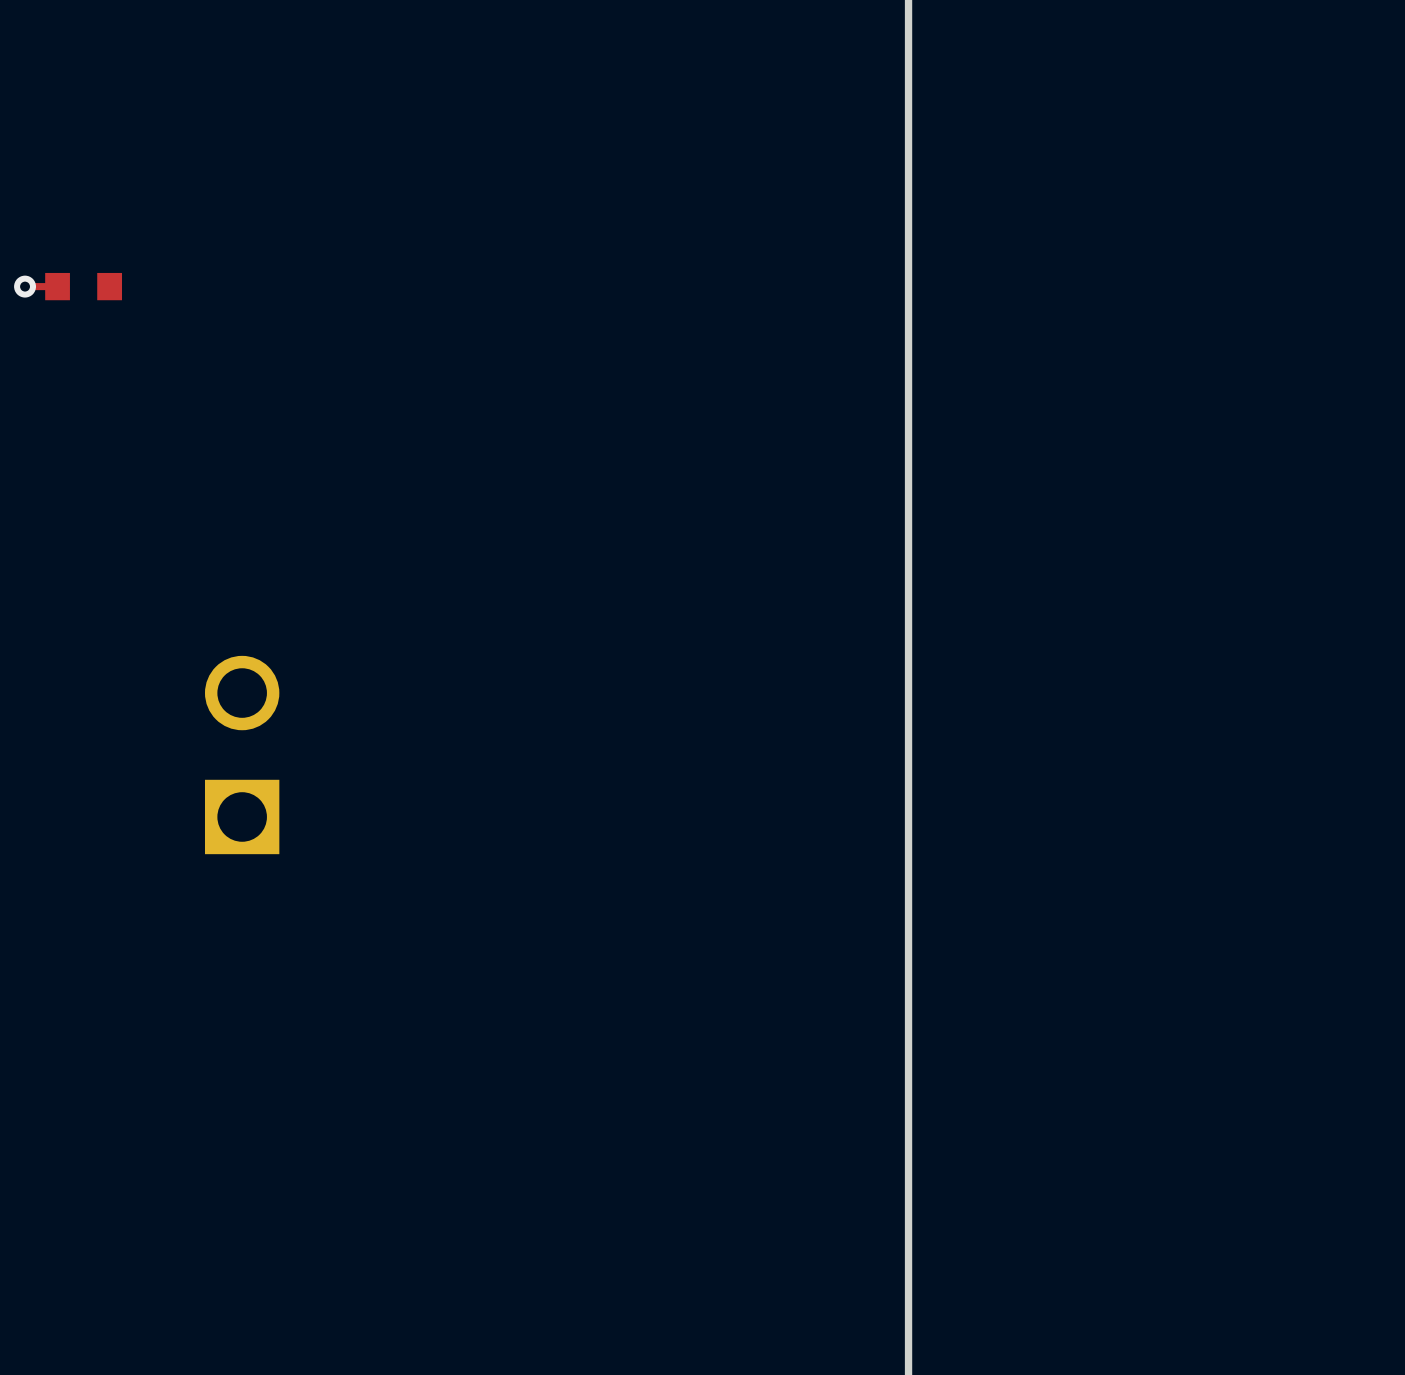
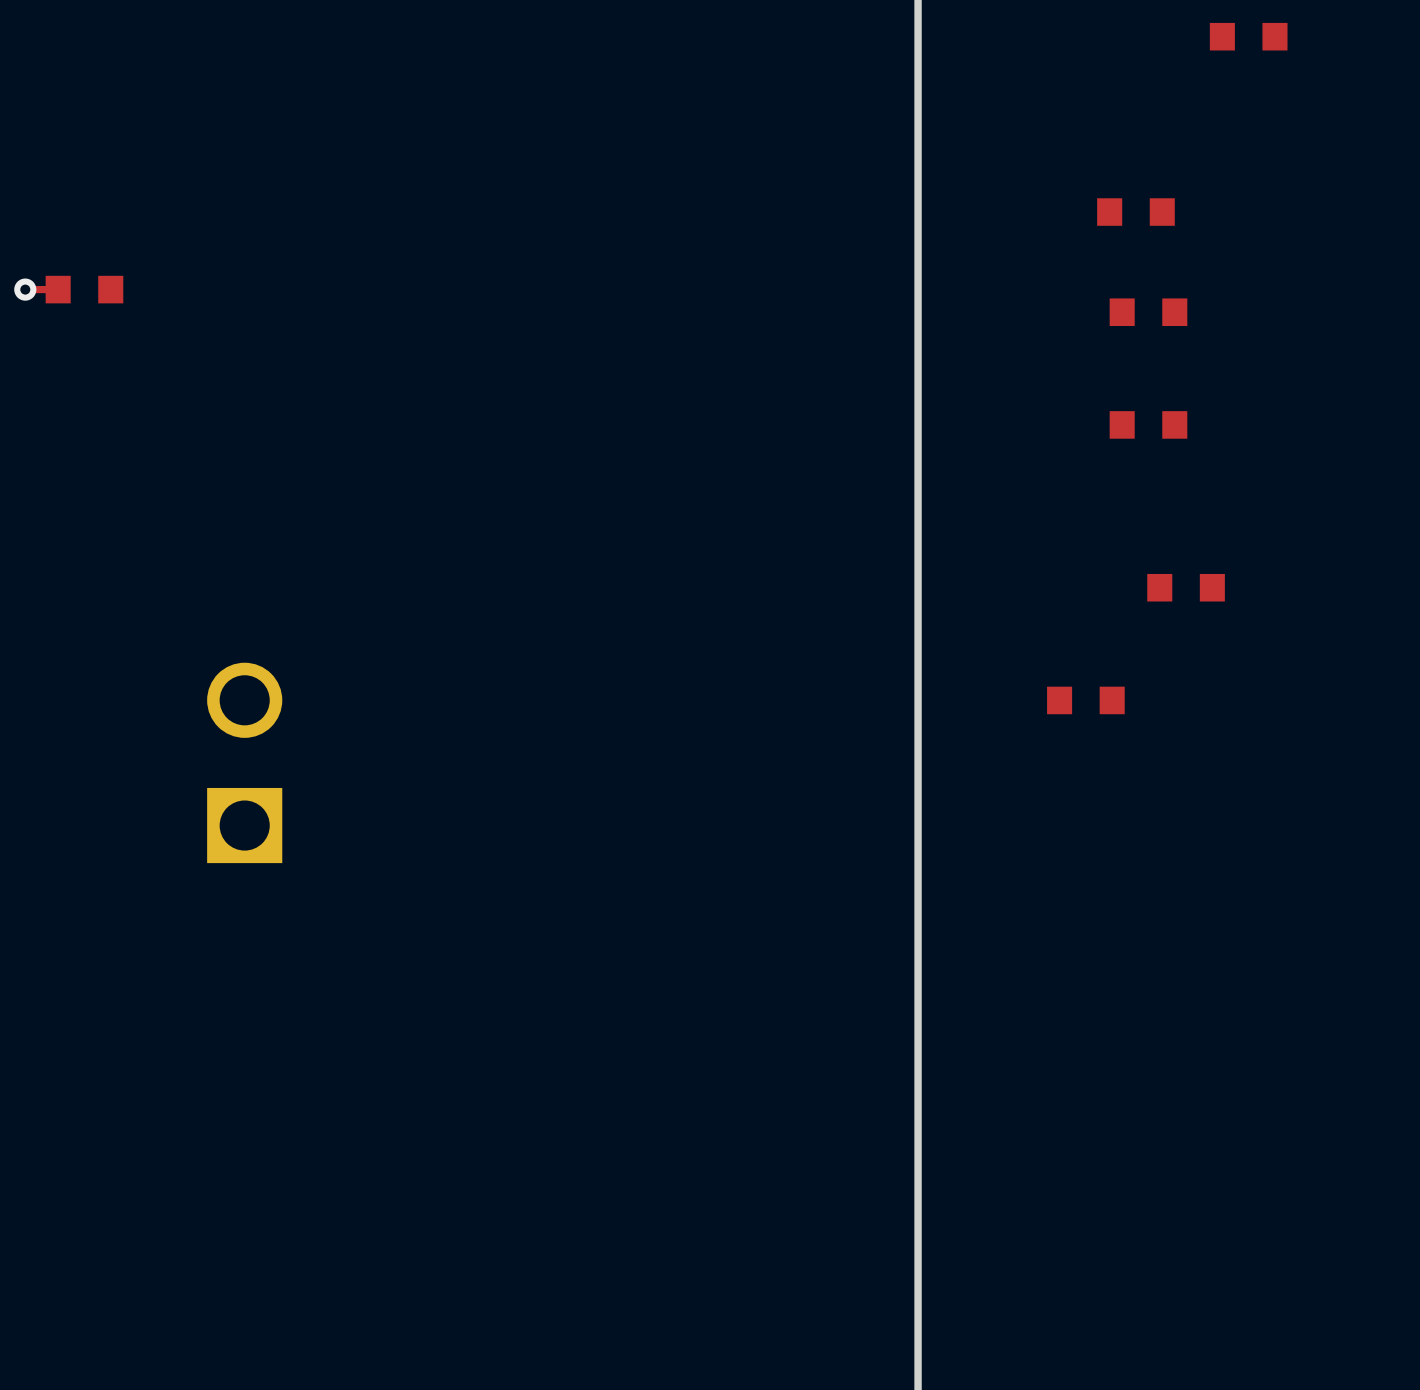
part: none -> (1248, 36)
part: none -> (1135, 212)
part: none -> (1148, 312)
part: none -> (1148, 424)
part: none -> (1186, 587)
part: none -> (1085, 700)

